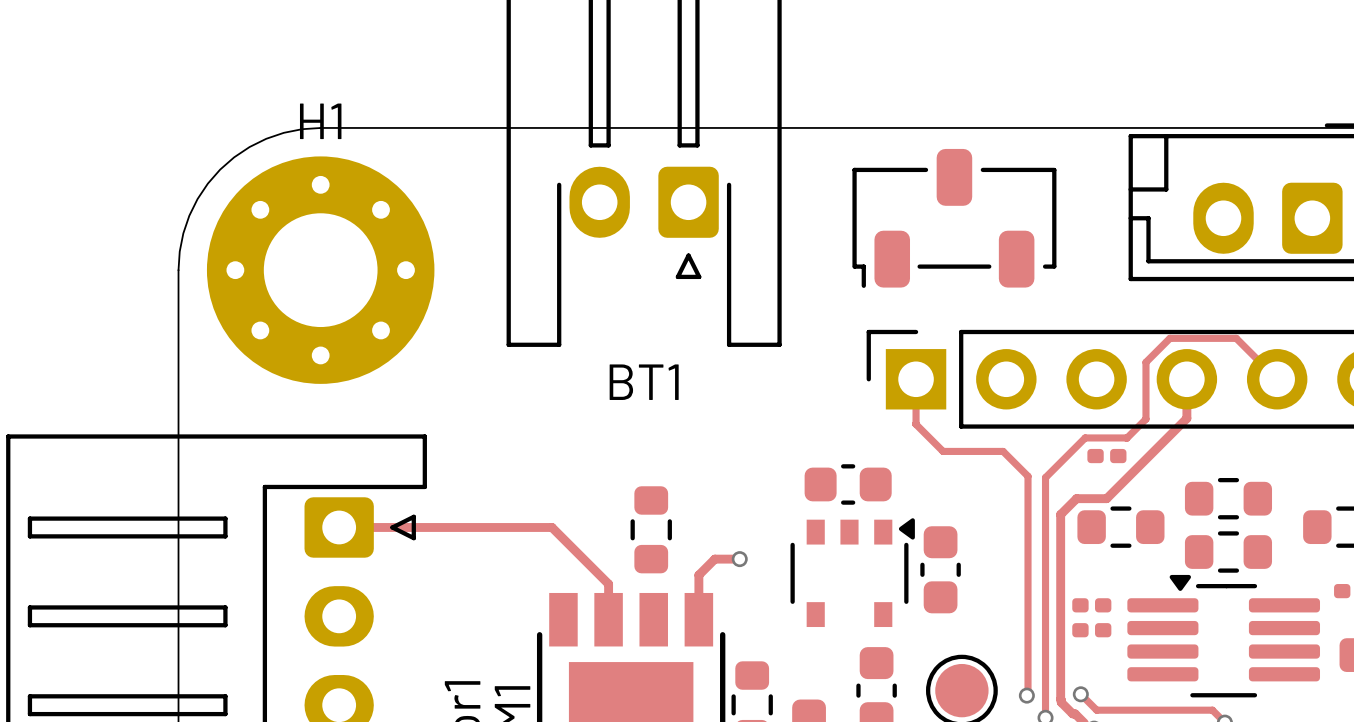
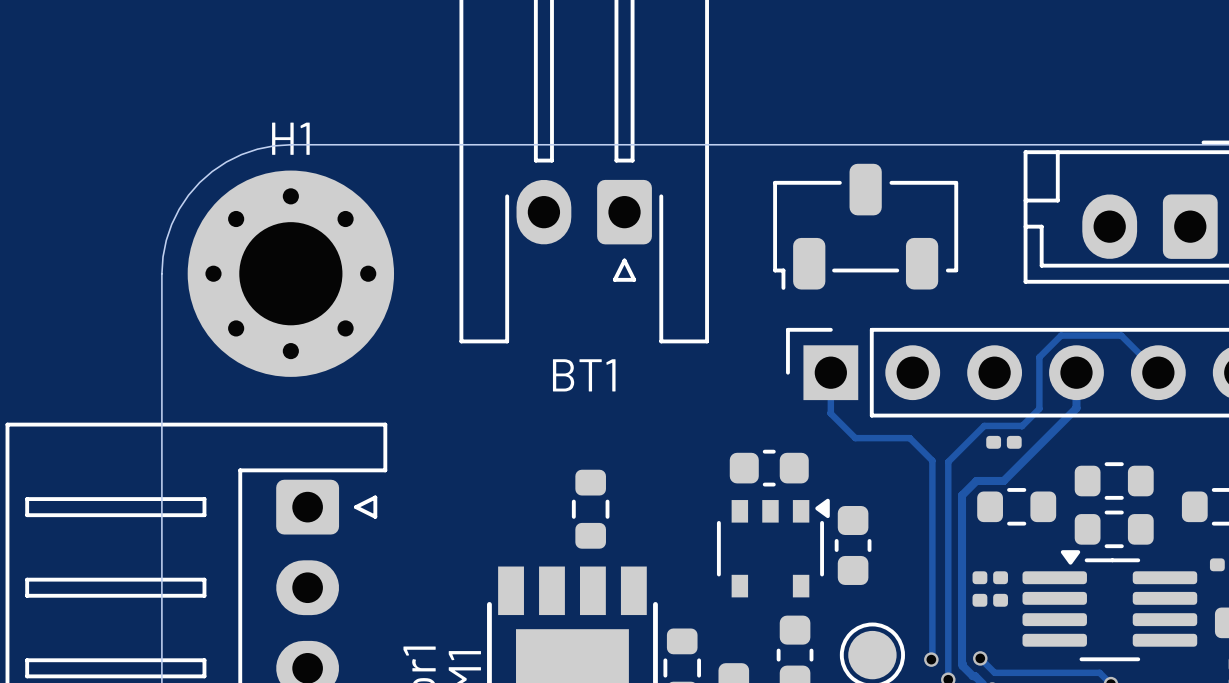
track: (339, 527) (551, 527) (608, 584) (608, 619) -> none
track: (739, 559) (714, 559) (698, 575) (698, 619) -> none
via: (739, 559) -> none

